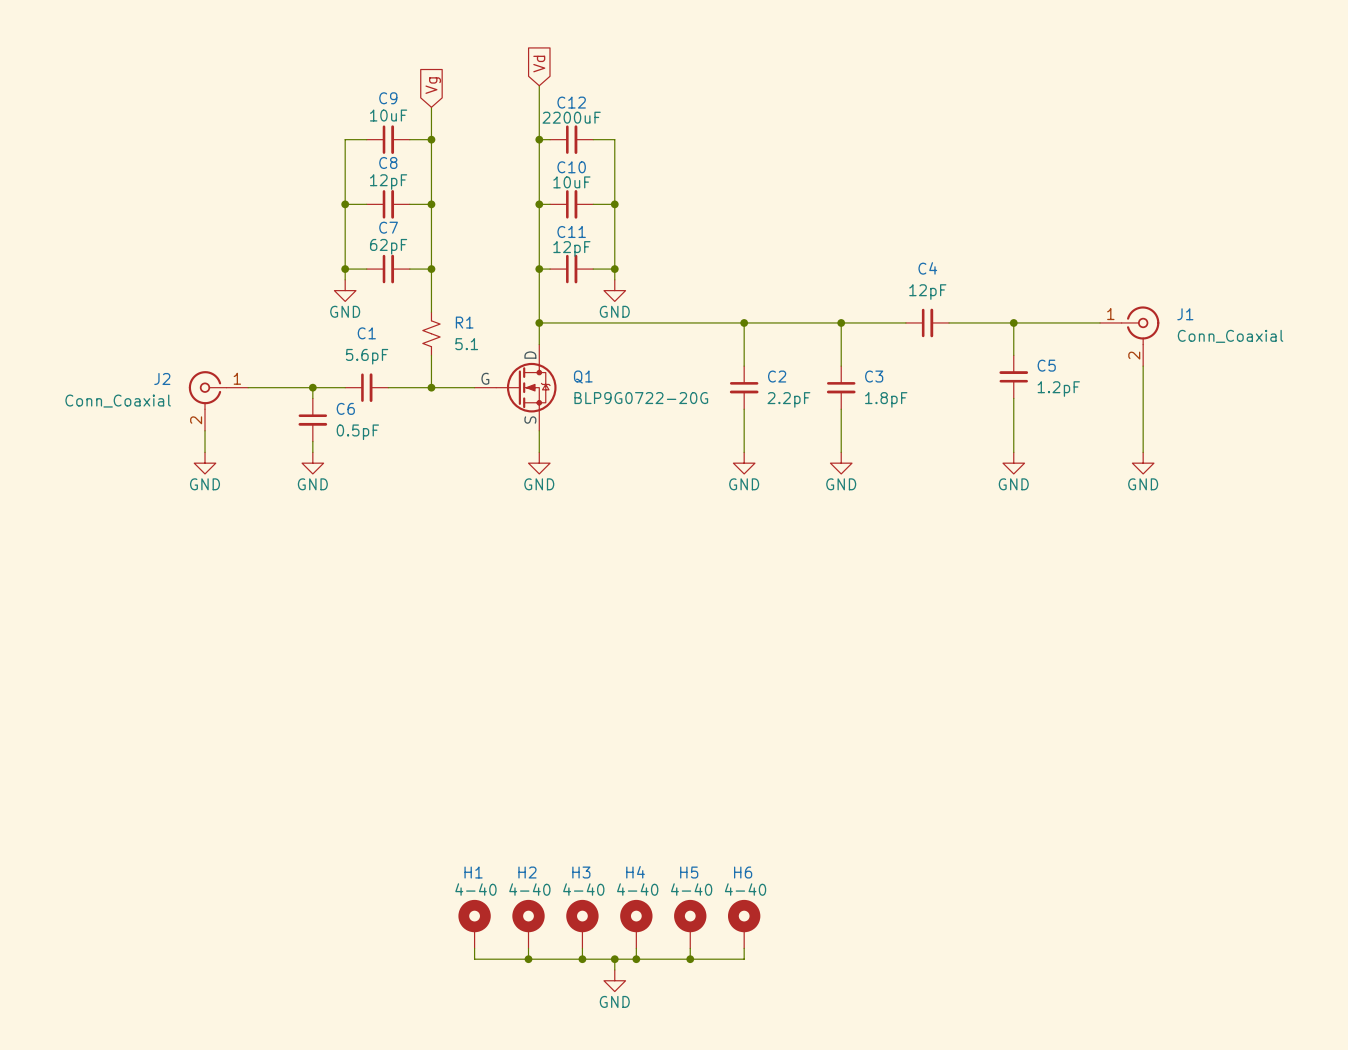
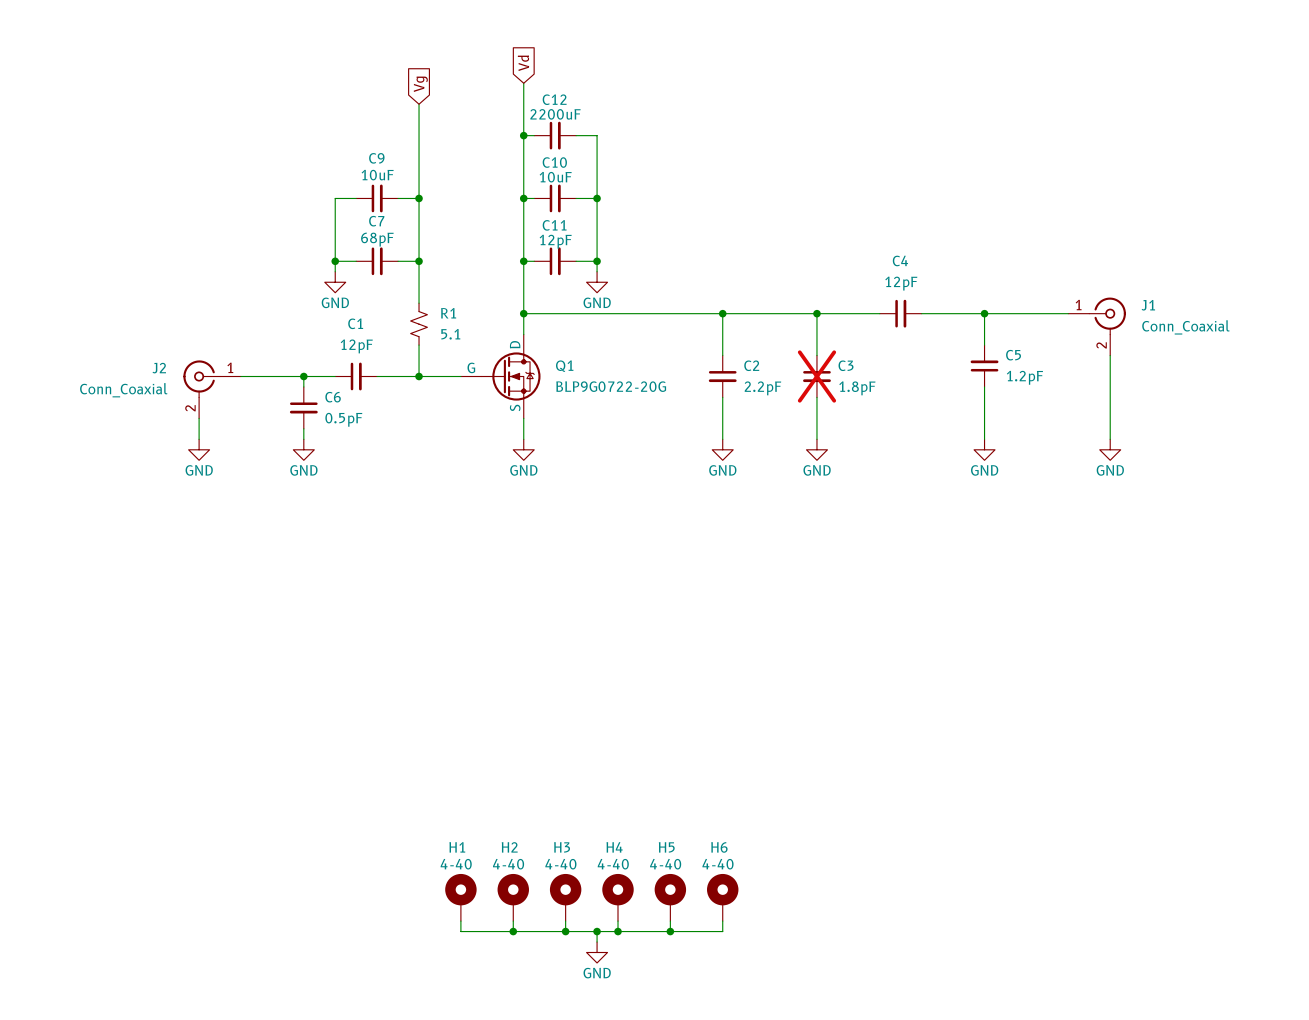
wire: (366, 139) (345, 139) (345, 204) -> none
C9: 10uF (388, 139) -> none
wire: (409, 139) (431, 139) -> none
junction: (431, 139) -> none
C8 name: C8 (388, 162) -> C9 (376, 158)
C8 value: 12pF (388, 182) -> 10uF (377, 175)
junction: (345, 204) -> none
C7 value: 62pF (388, 246) -> 68pF (377, 239)
C1 value: 5.6pF (367, 356) -> 12pF (356, 346)
C3 do-not-place cross: none -> (816, 376)

